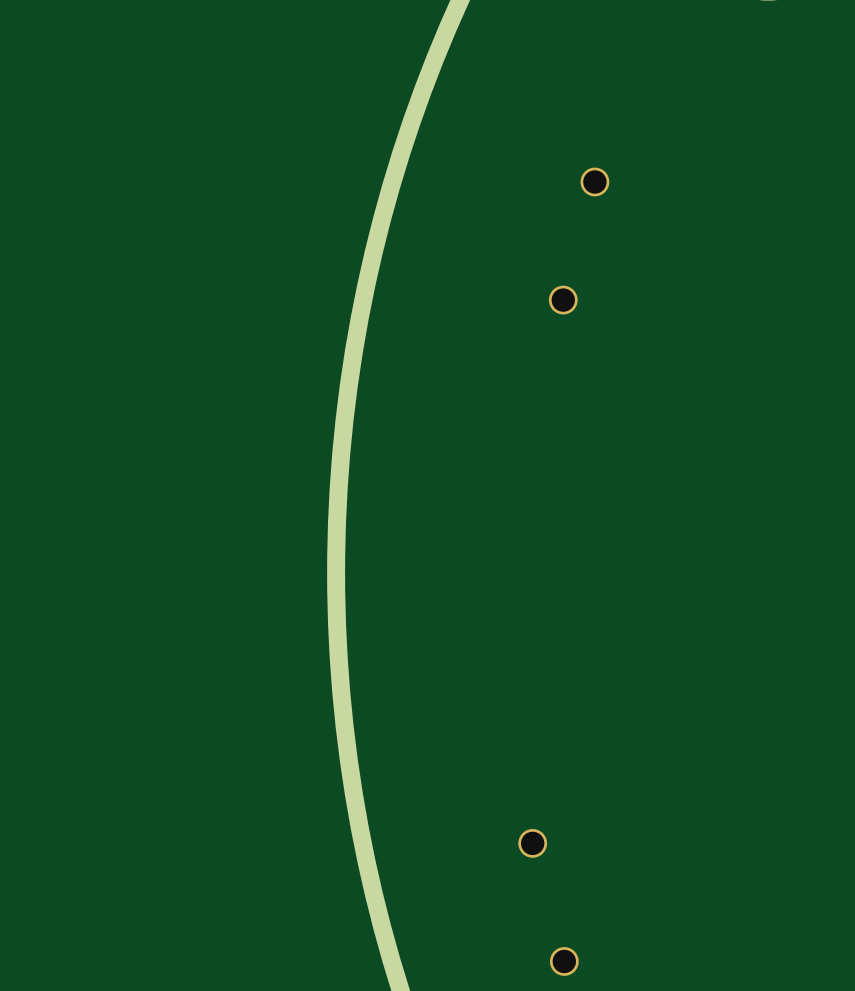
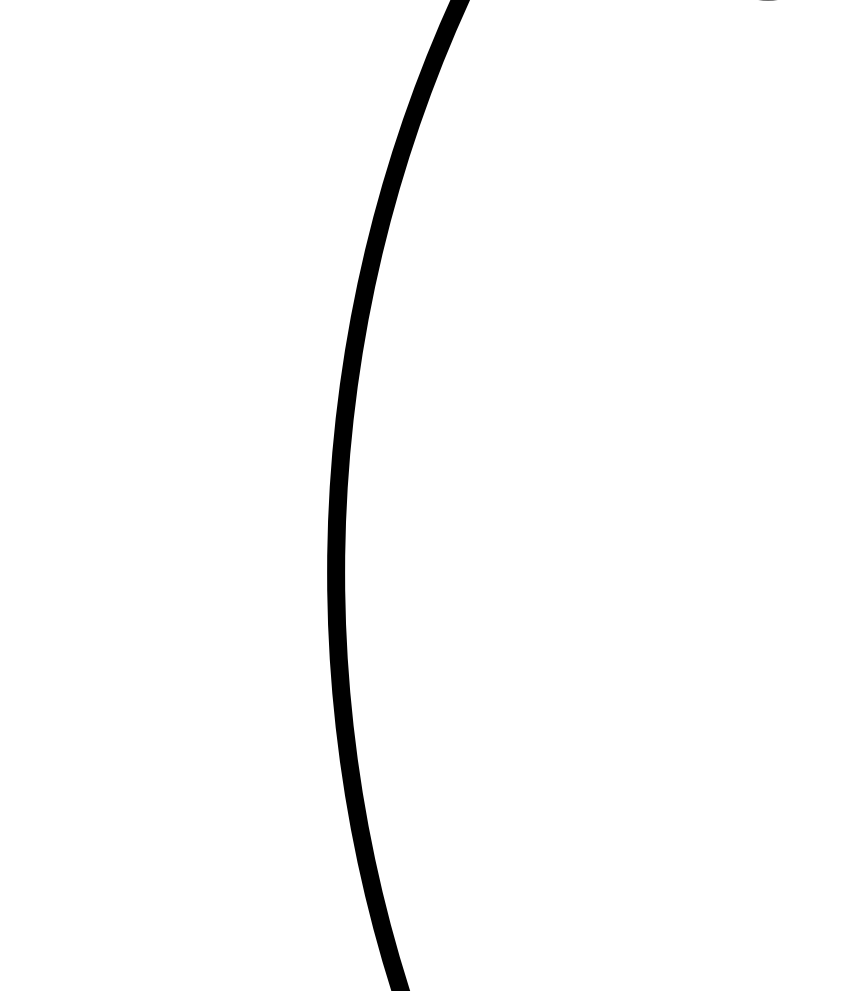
part: (579, 241) -> none
part: (548, 902) -> none

